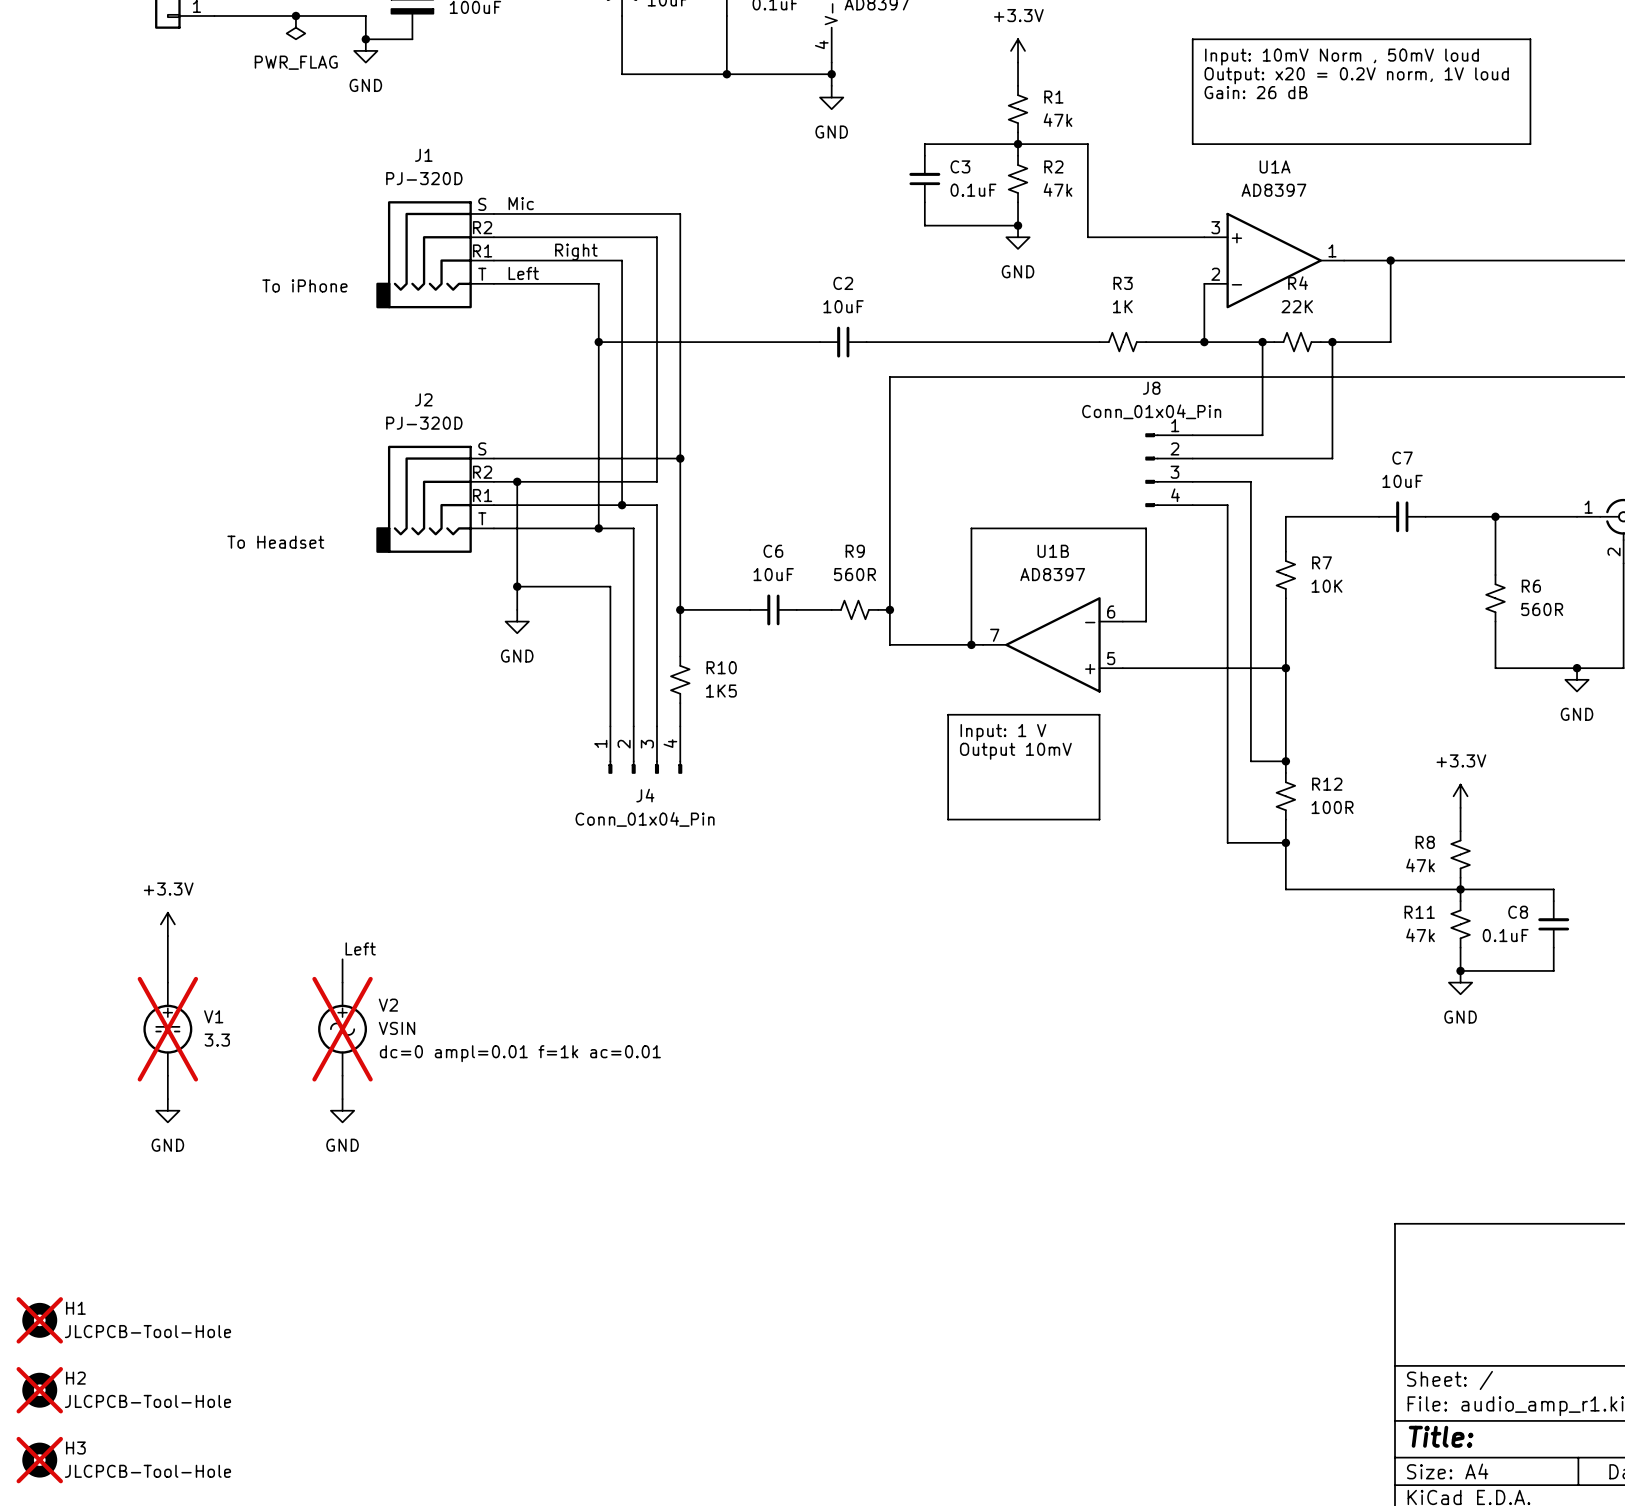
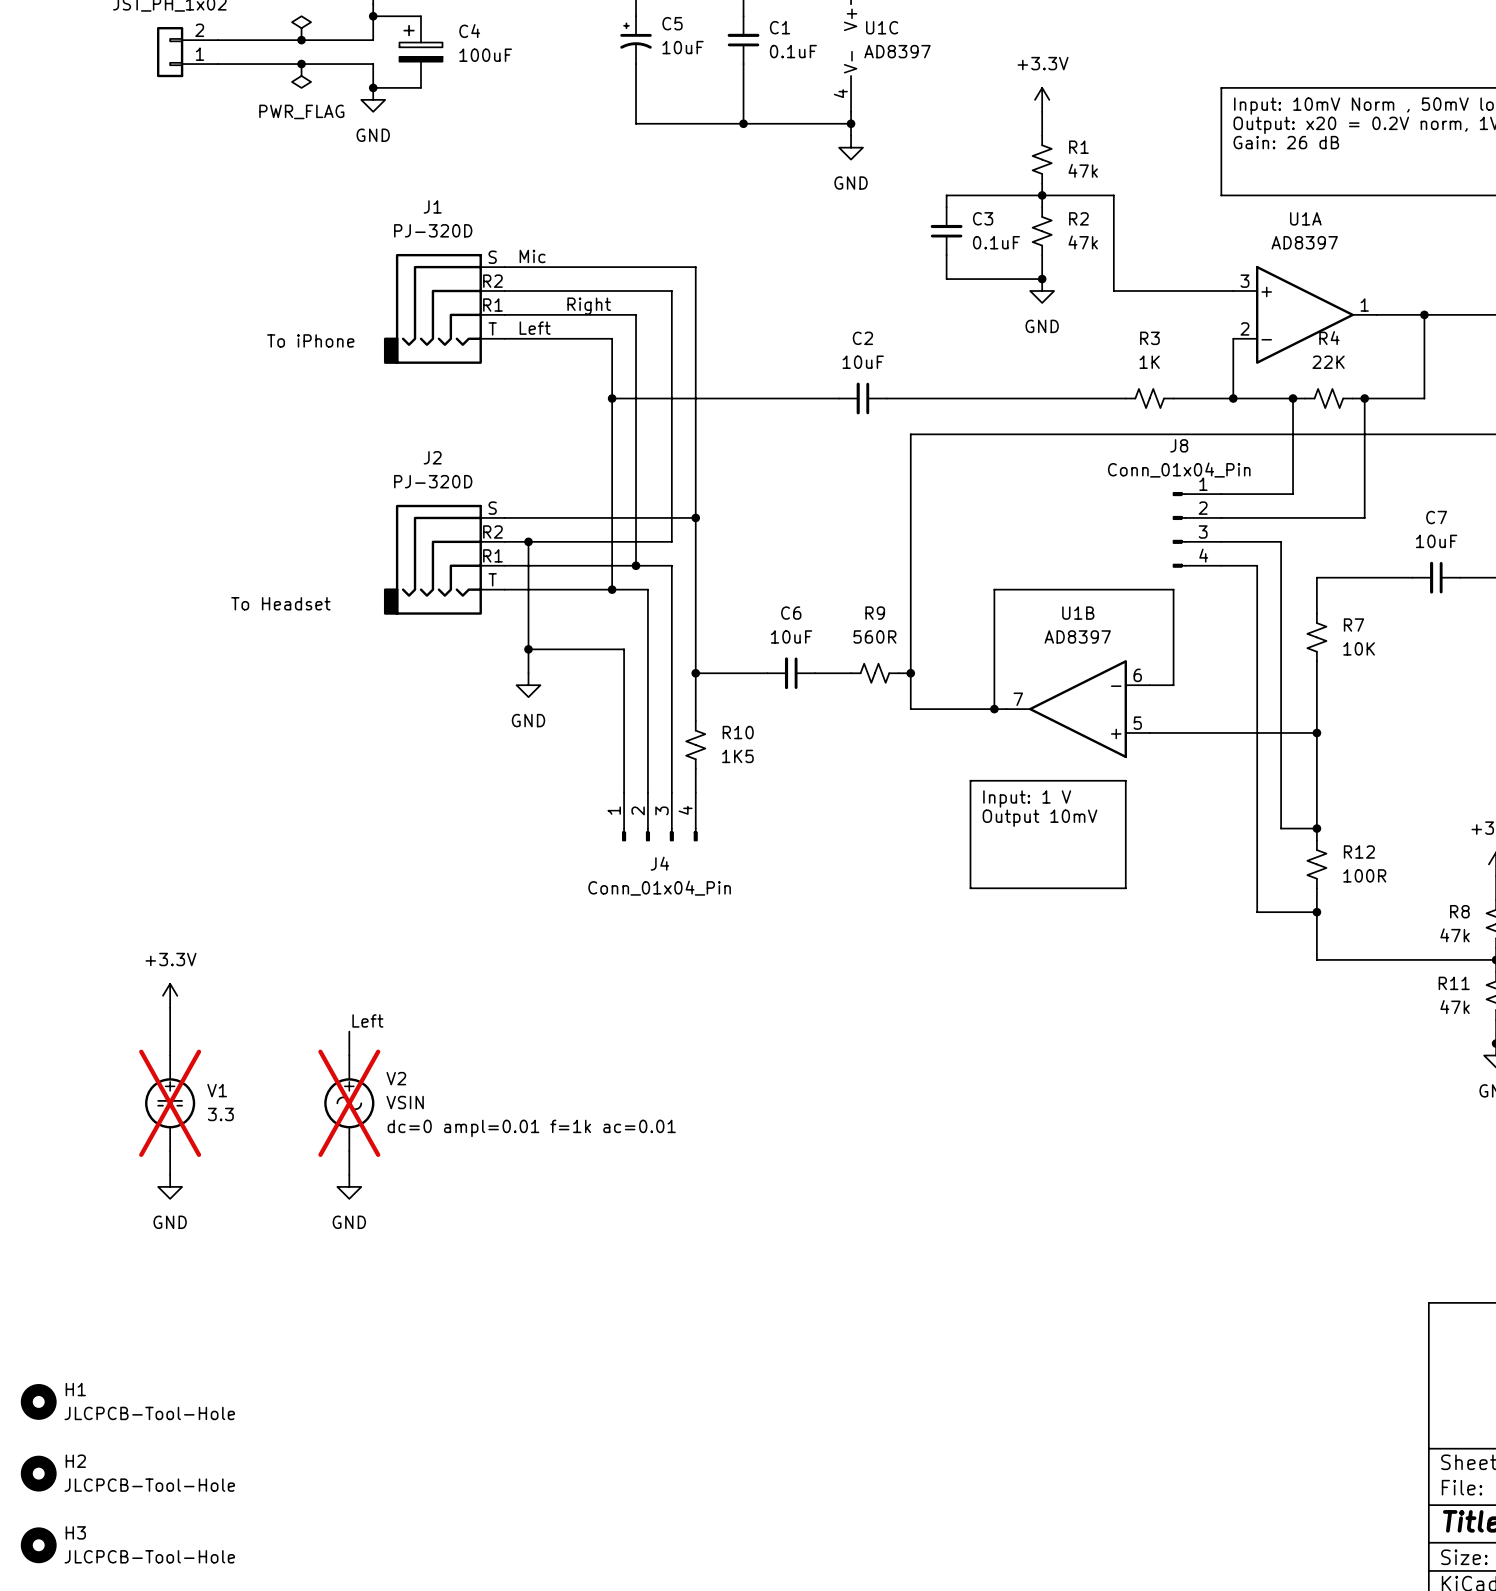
H1 do-not-place cross: (39, 1320) -> none
H2 do-not-place cross: (39, 1390) -> none
H3 do-not-place cross: (39, 1460) -> none

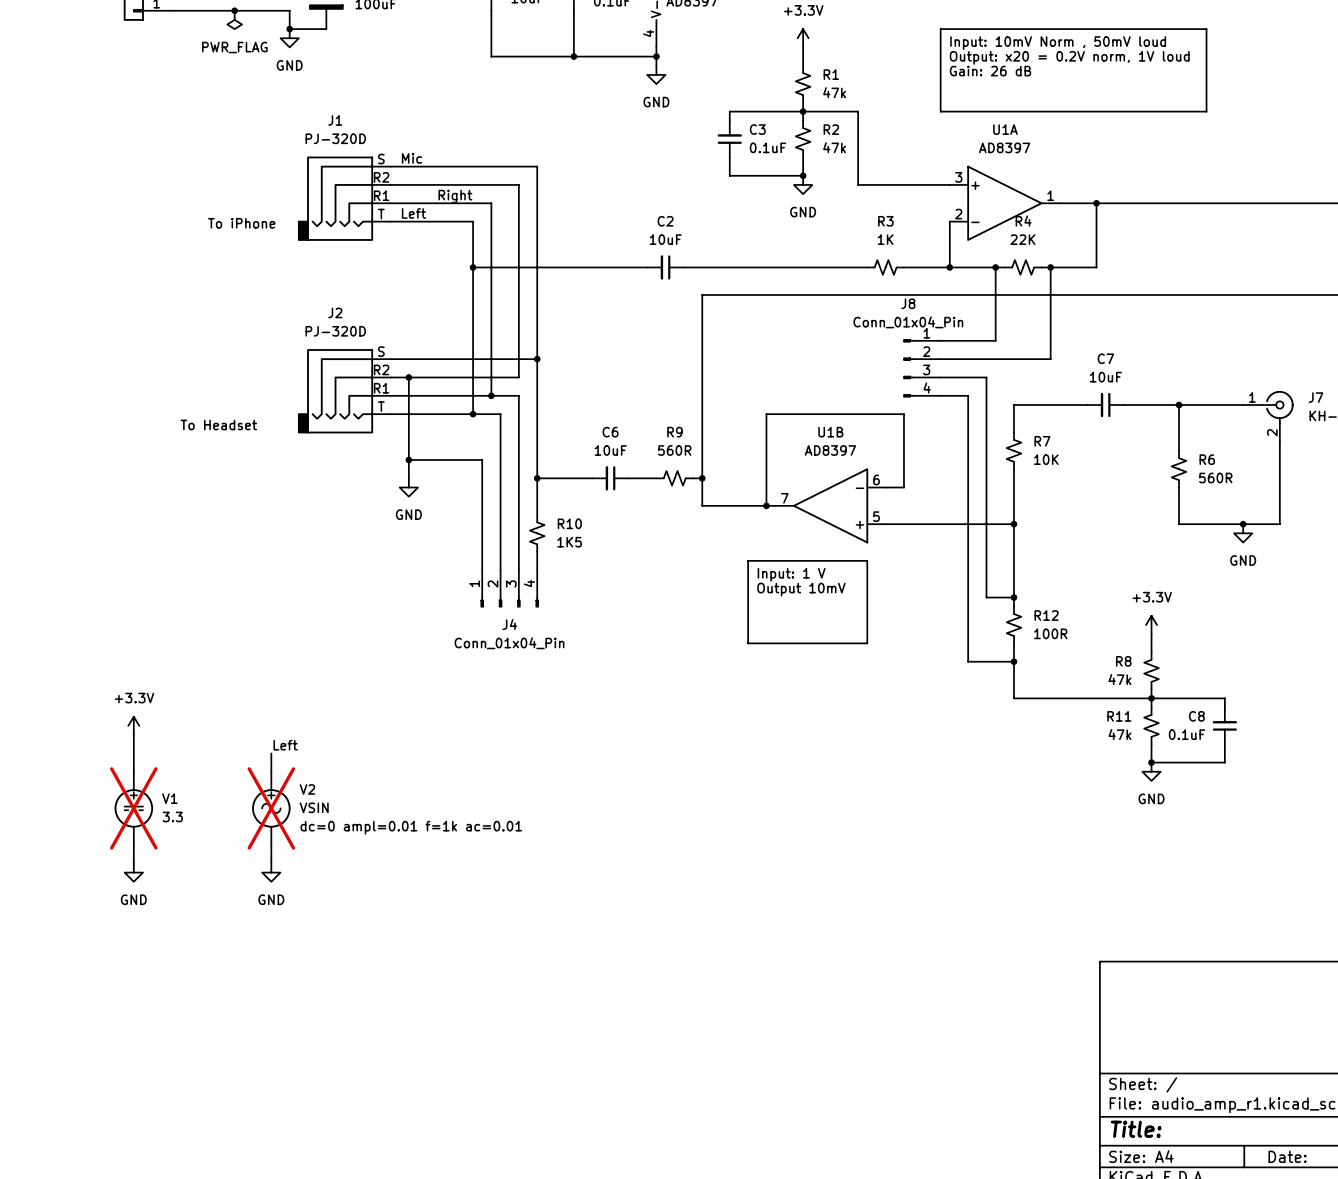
H1: JLCPCB-Tool-Hole (38, 1401) -> none
H2: JLCPCB-Tool-Hole (38, 1473) -> none
H3: JLCPCB-Tool-Hole (38, 1545) -> none

